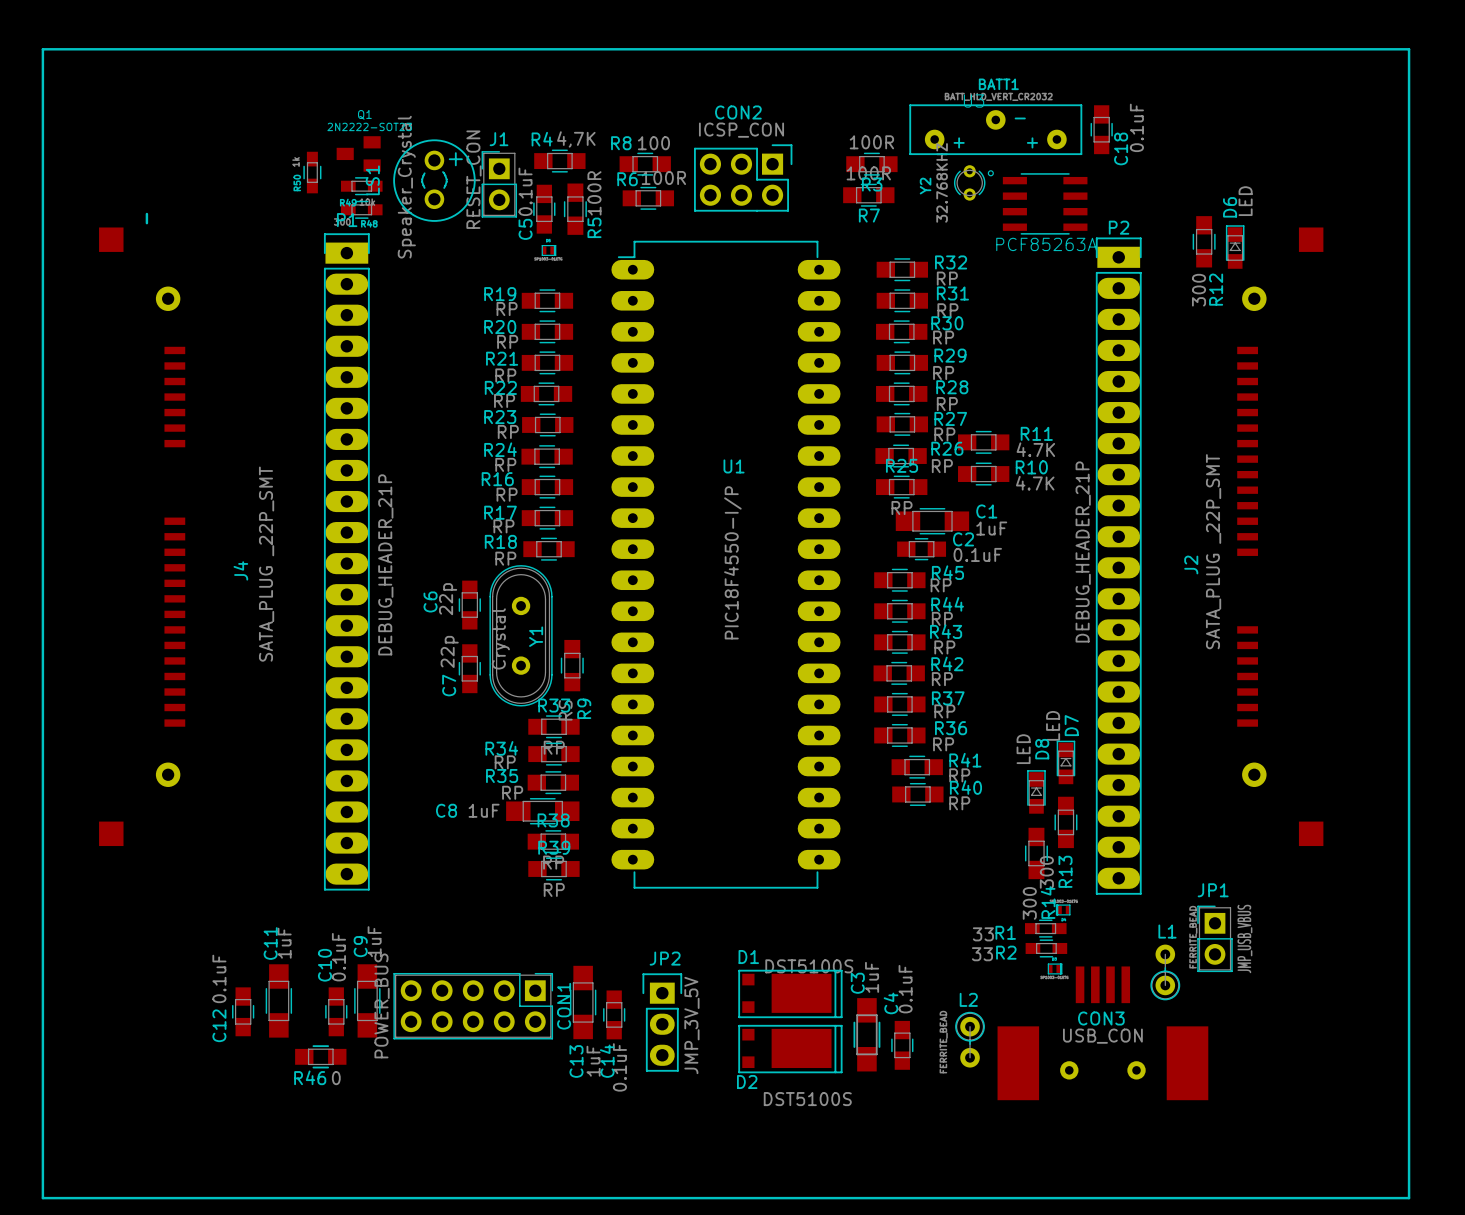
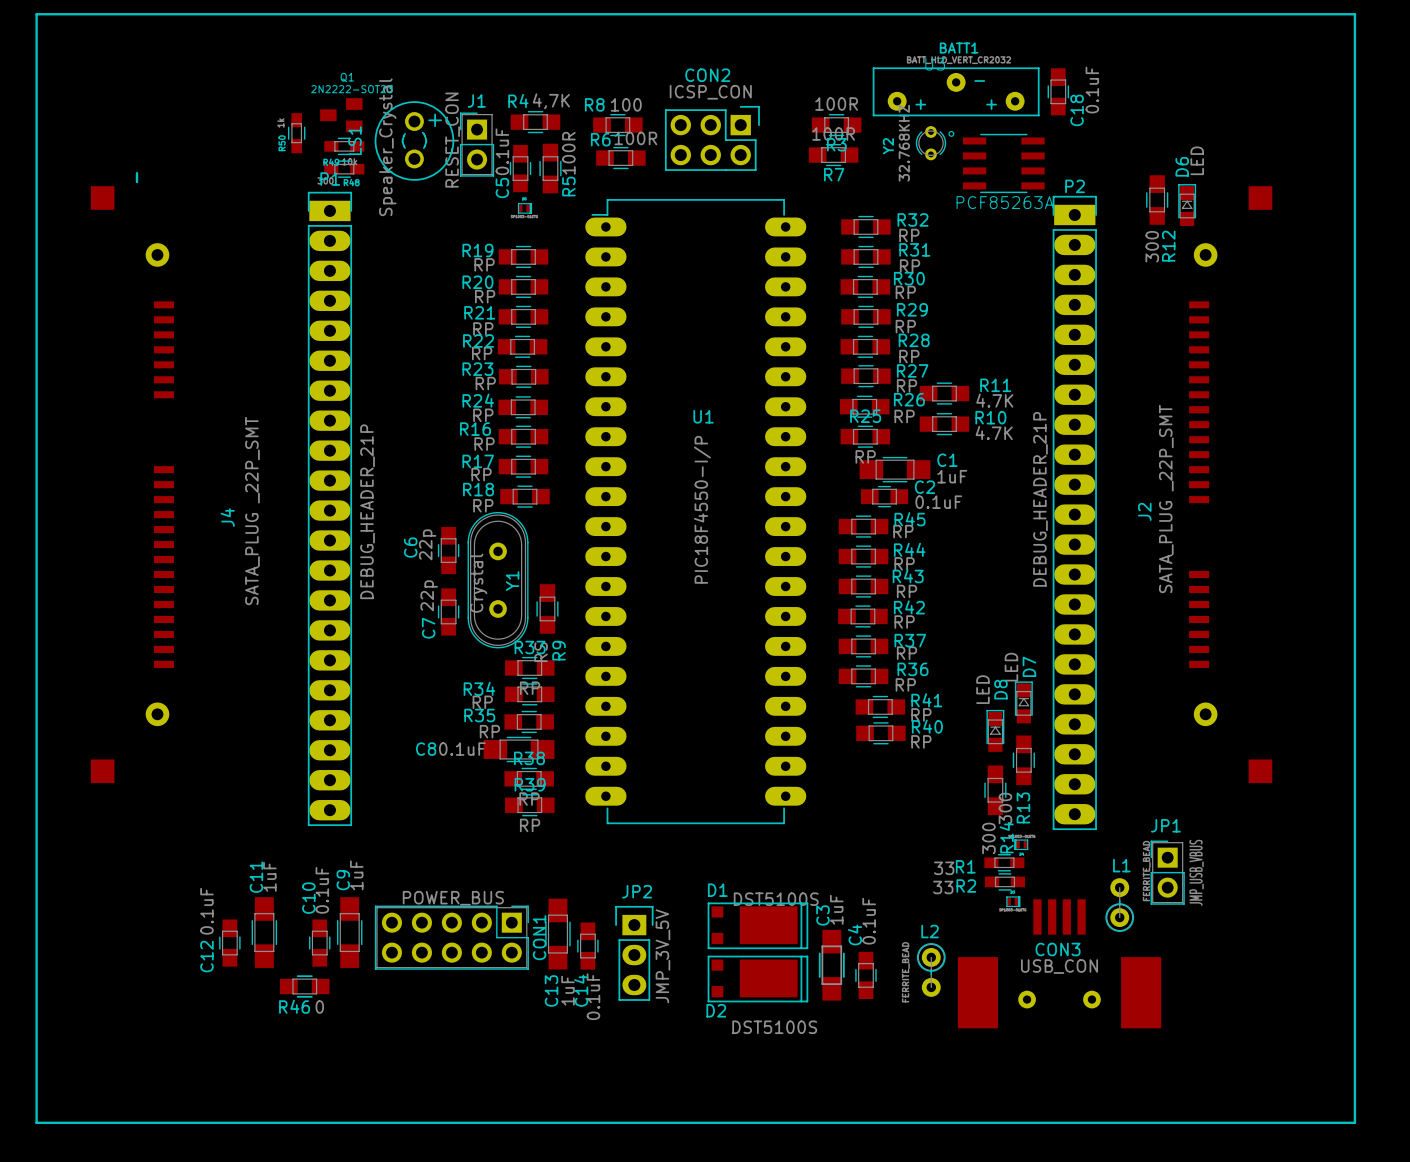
C8 value: 1uF (484, 810) -> 0.1uF (462, 749)
CON1 value rotation: 0° (382, 1005) -> 90° clockwise (453, 898)

